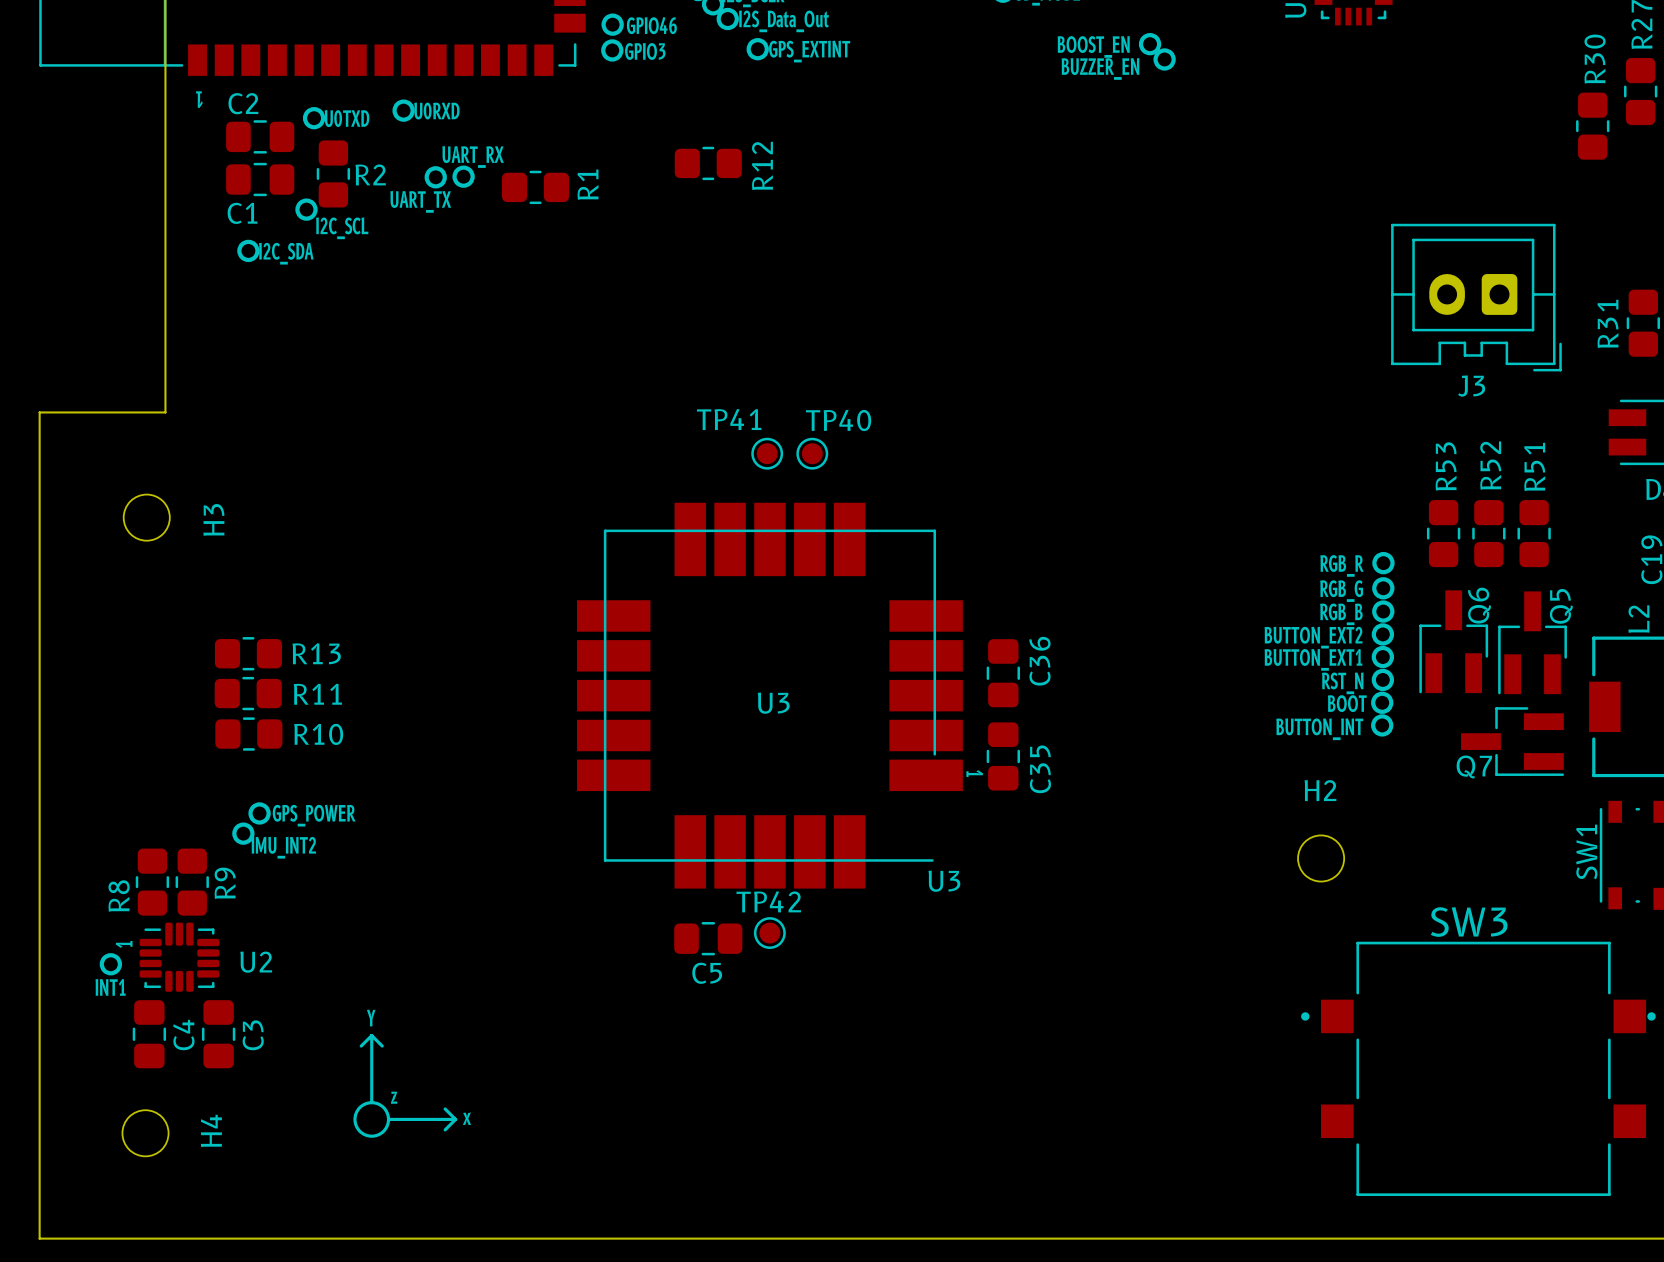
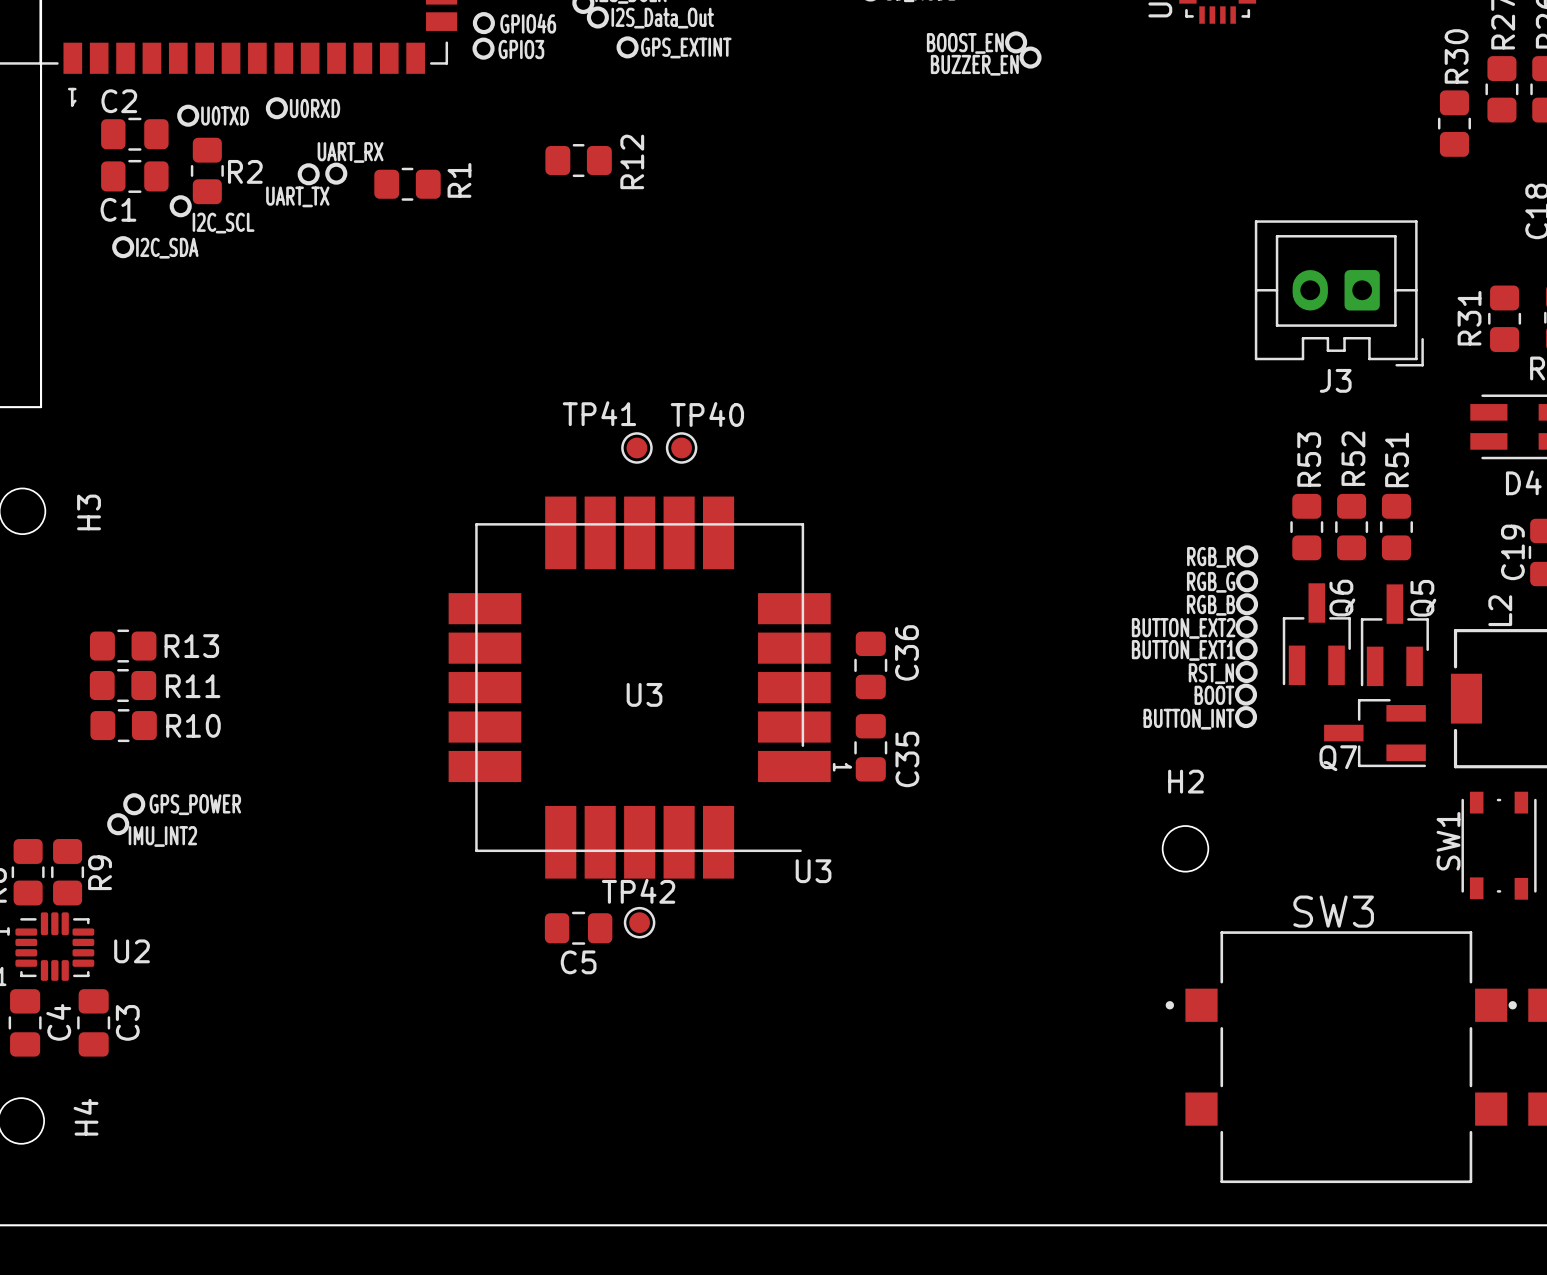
text: Y (371, 1018) -> none
line: (371, 1035) (382, 1046) -> none
line: (371, 1035) (361, 1046) -> none
line: (371, 1035) (371, 1102) -> none
text: z (394, 1097) -> none
drawing: [353, 1101, 391, 1138] -> none
line: (445, 1108) (455, 1119) -> none
text: x (466, 1118) -> none
line: (388, 1119) (455, 1119) -> none
line: (455, 1119) (445, 1129) -> none

